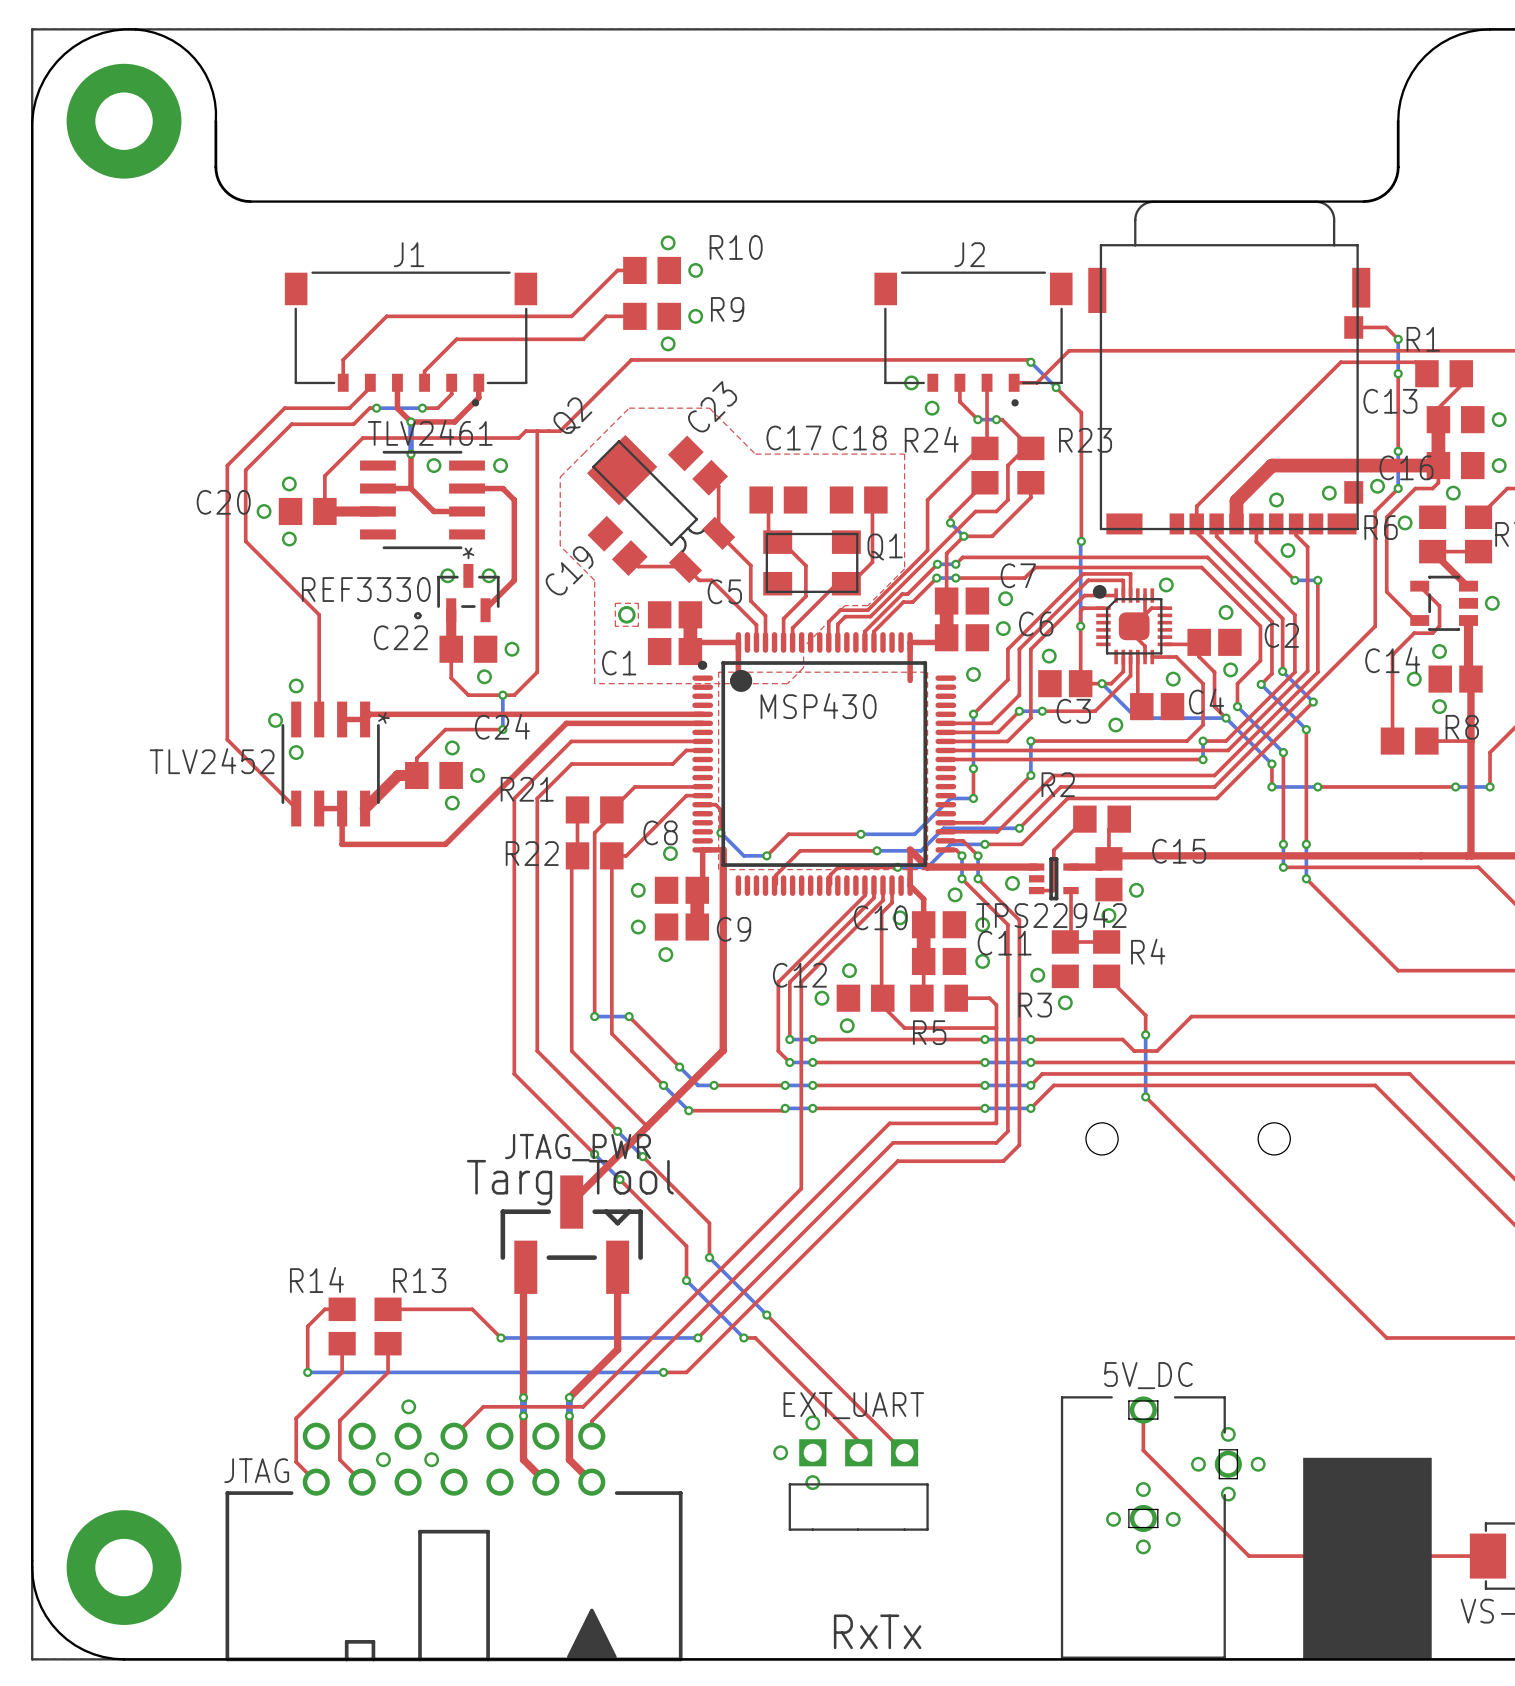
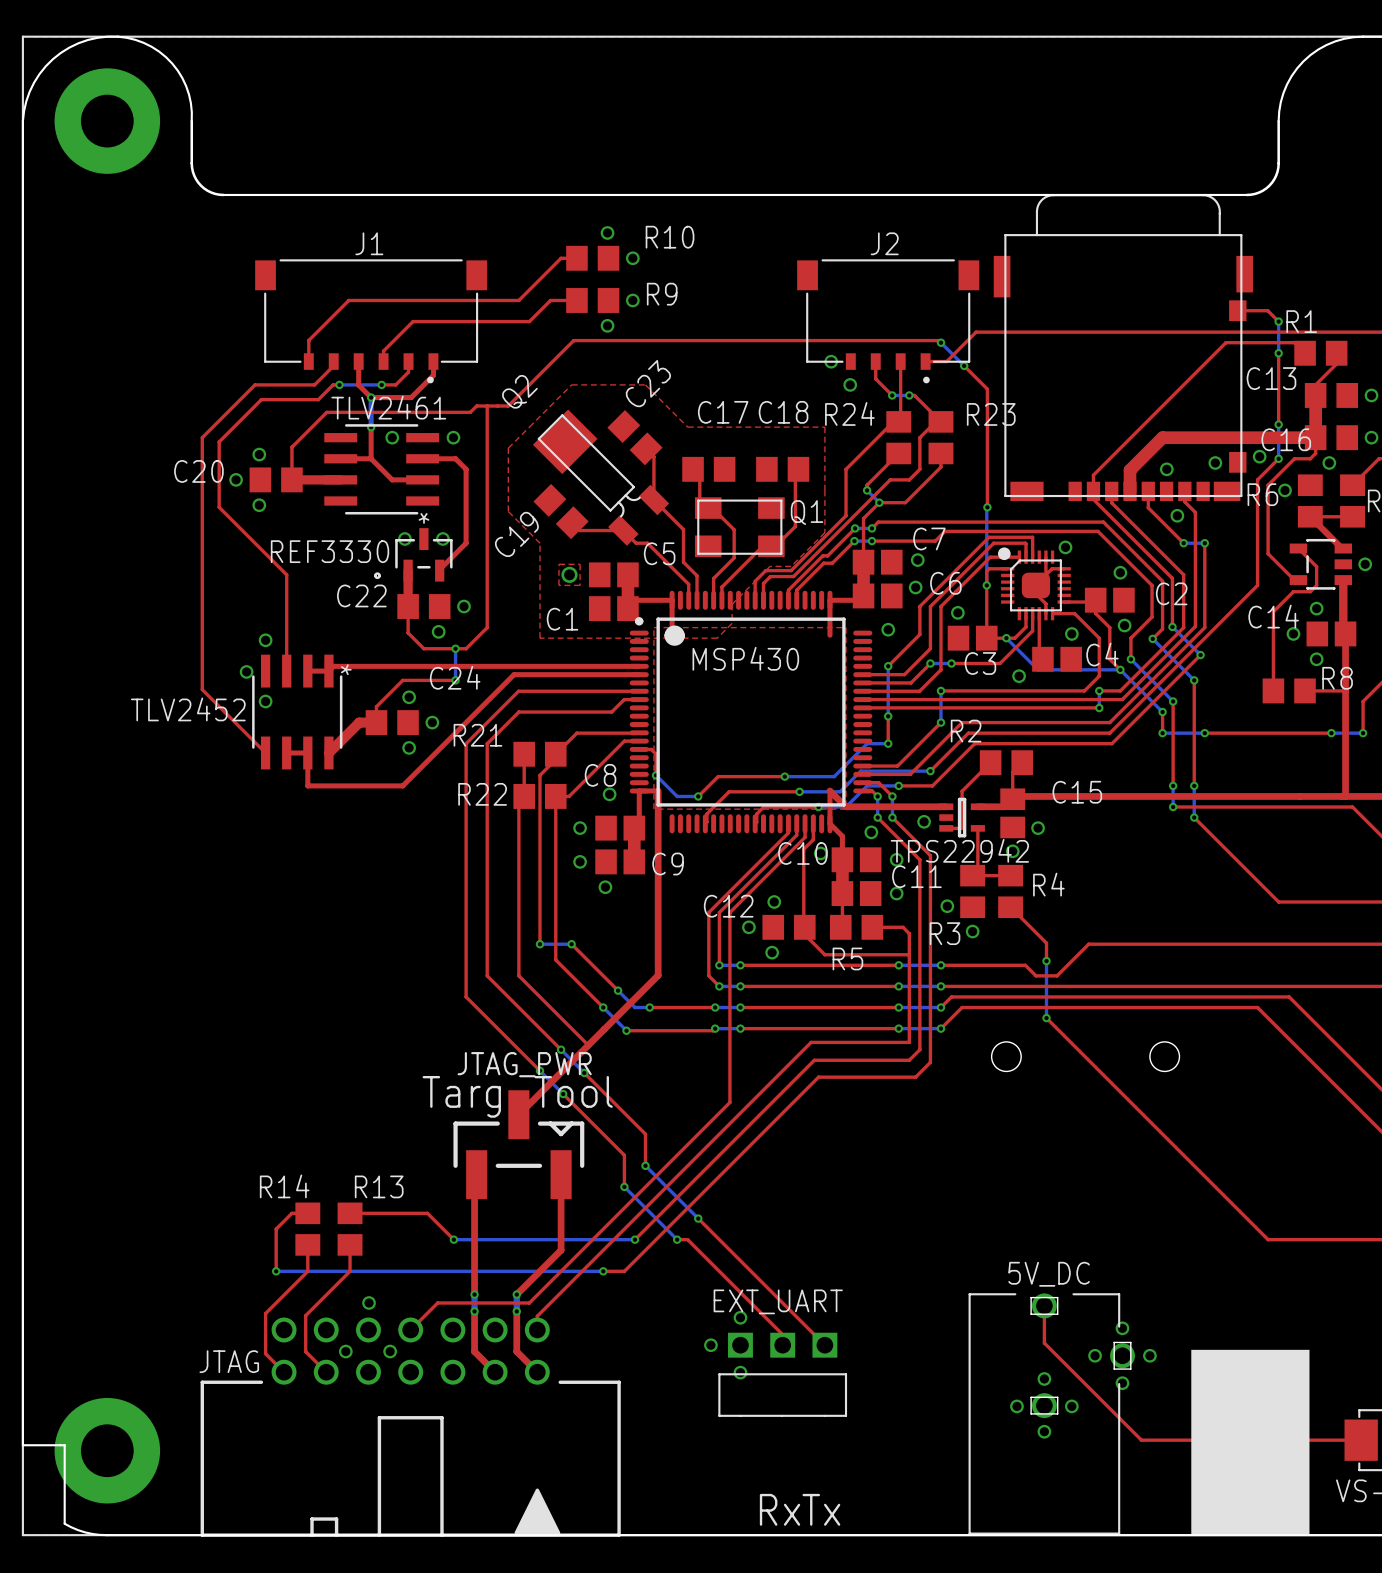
board edge: (32, 1561) (32, 1577) (37, 1597) (46, 1616) (59, 1632) (84, 1650) (103, 1657) (124, 1659) -> (22, 1445) (64, 1445) (64, 1523) (85, 1532) (107, 1535)

